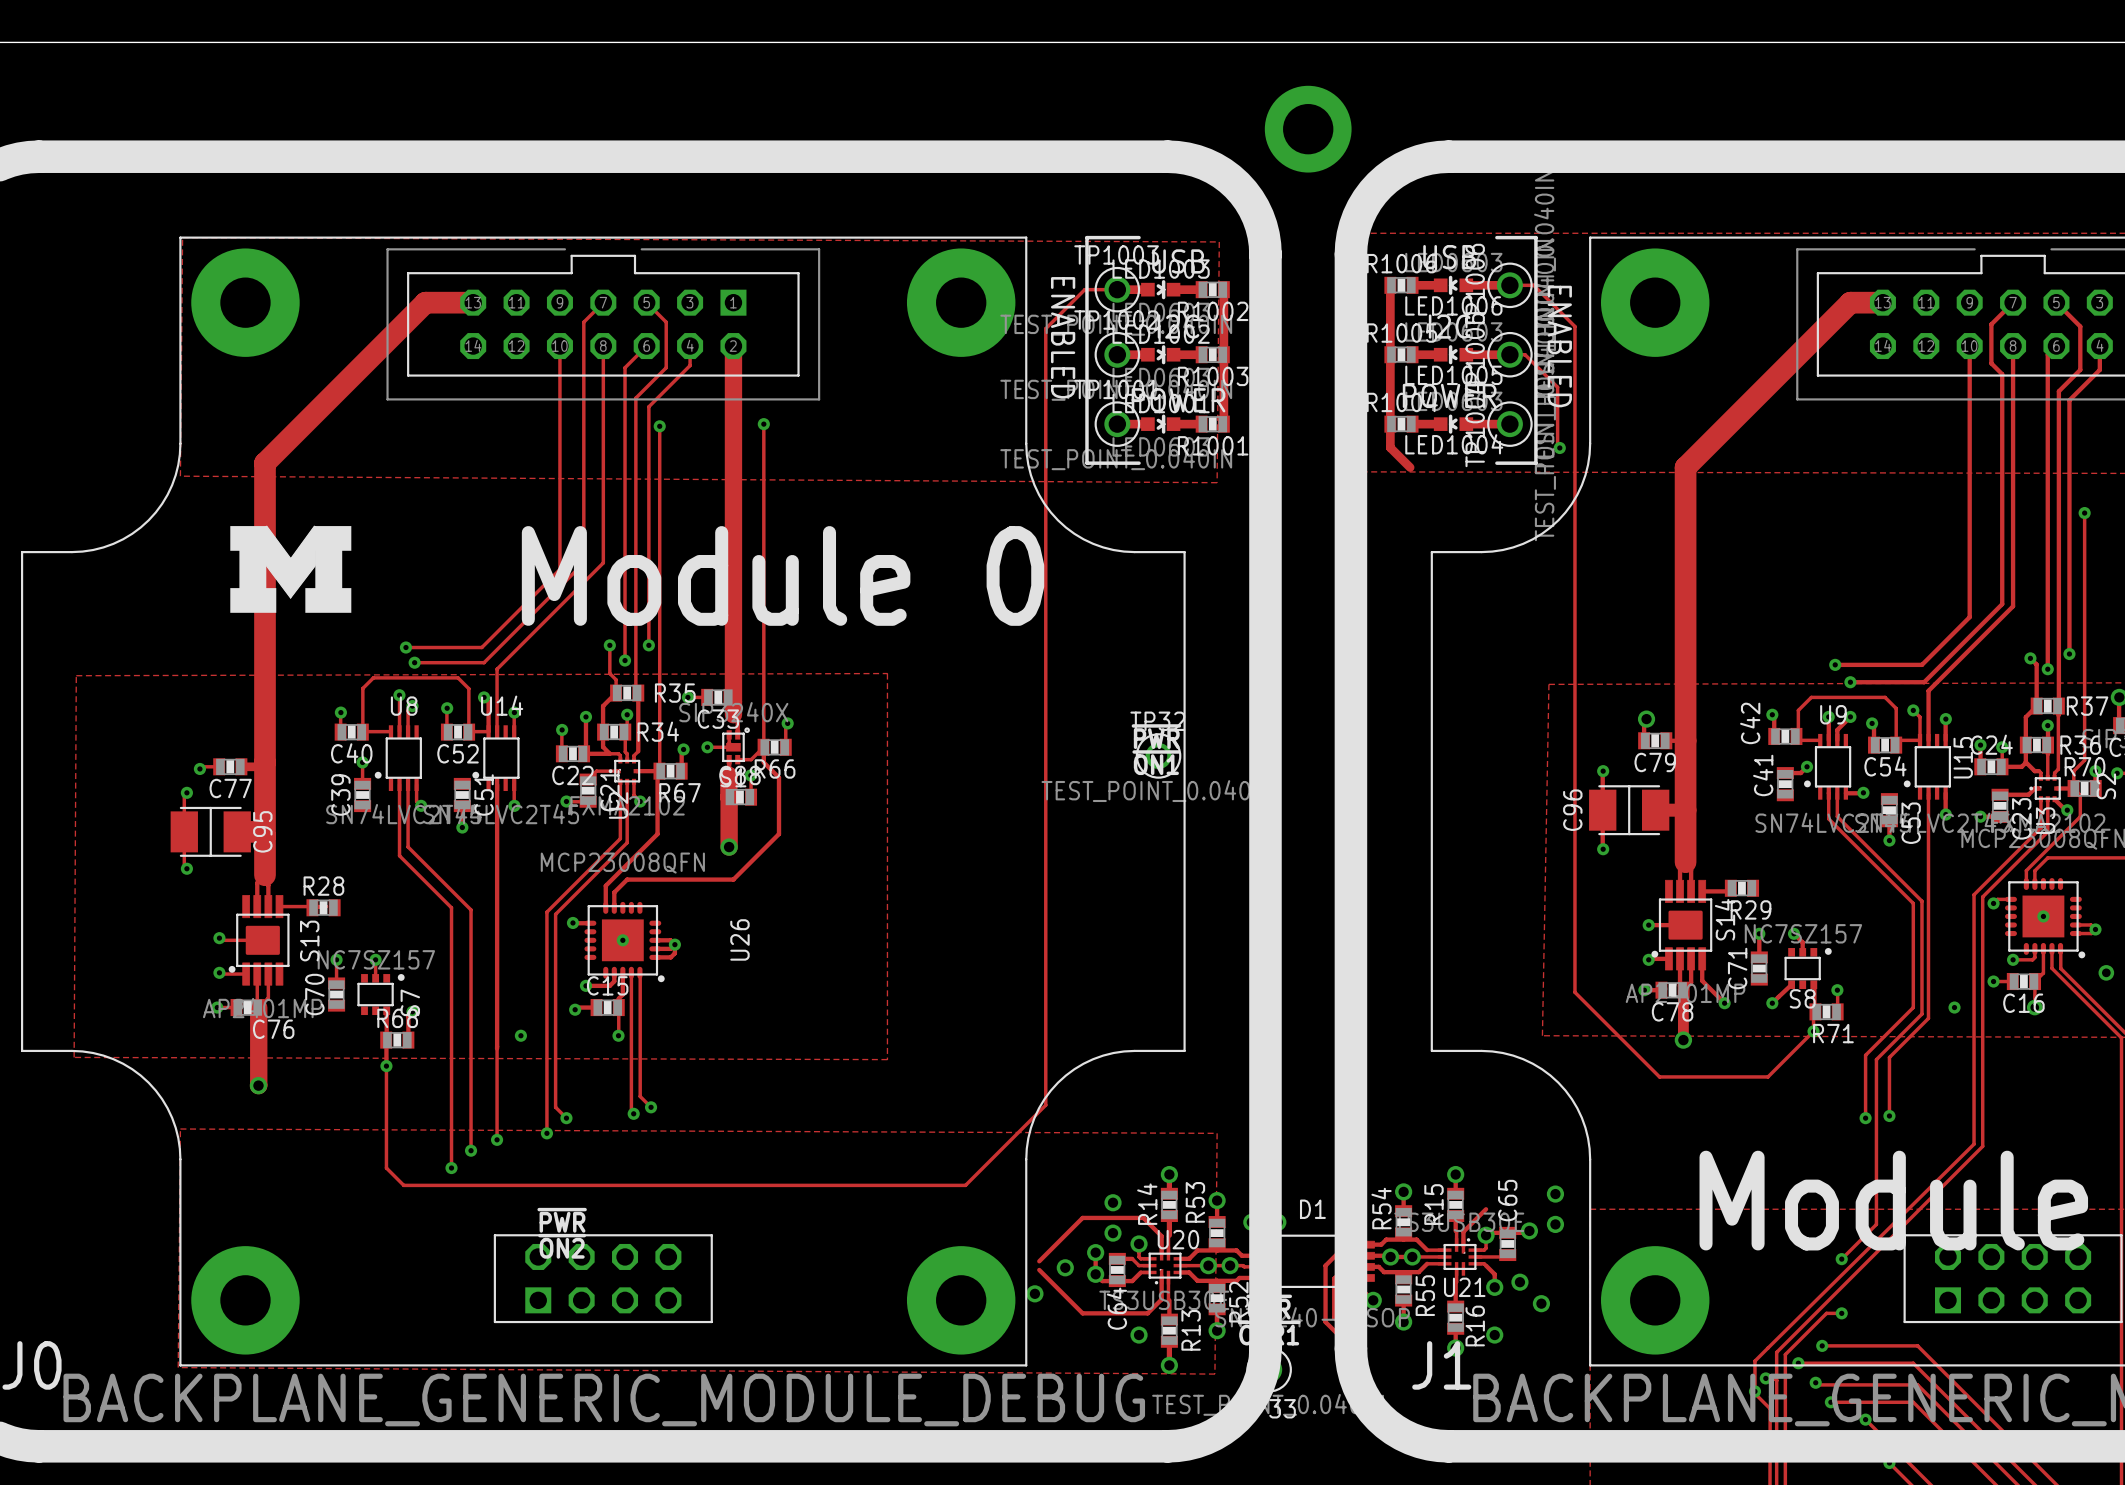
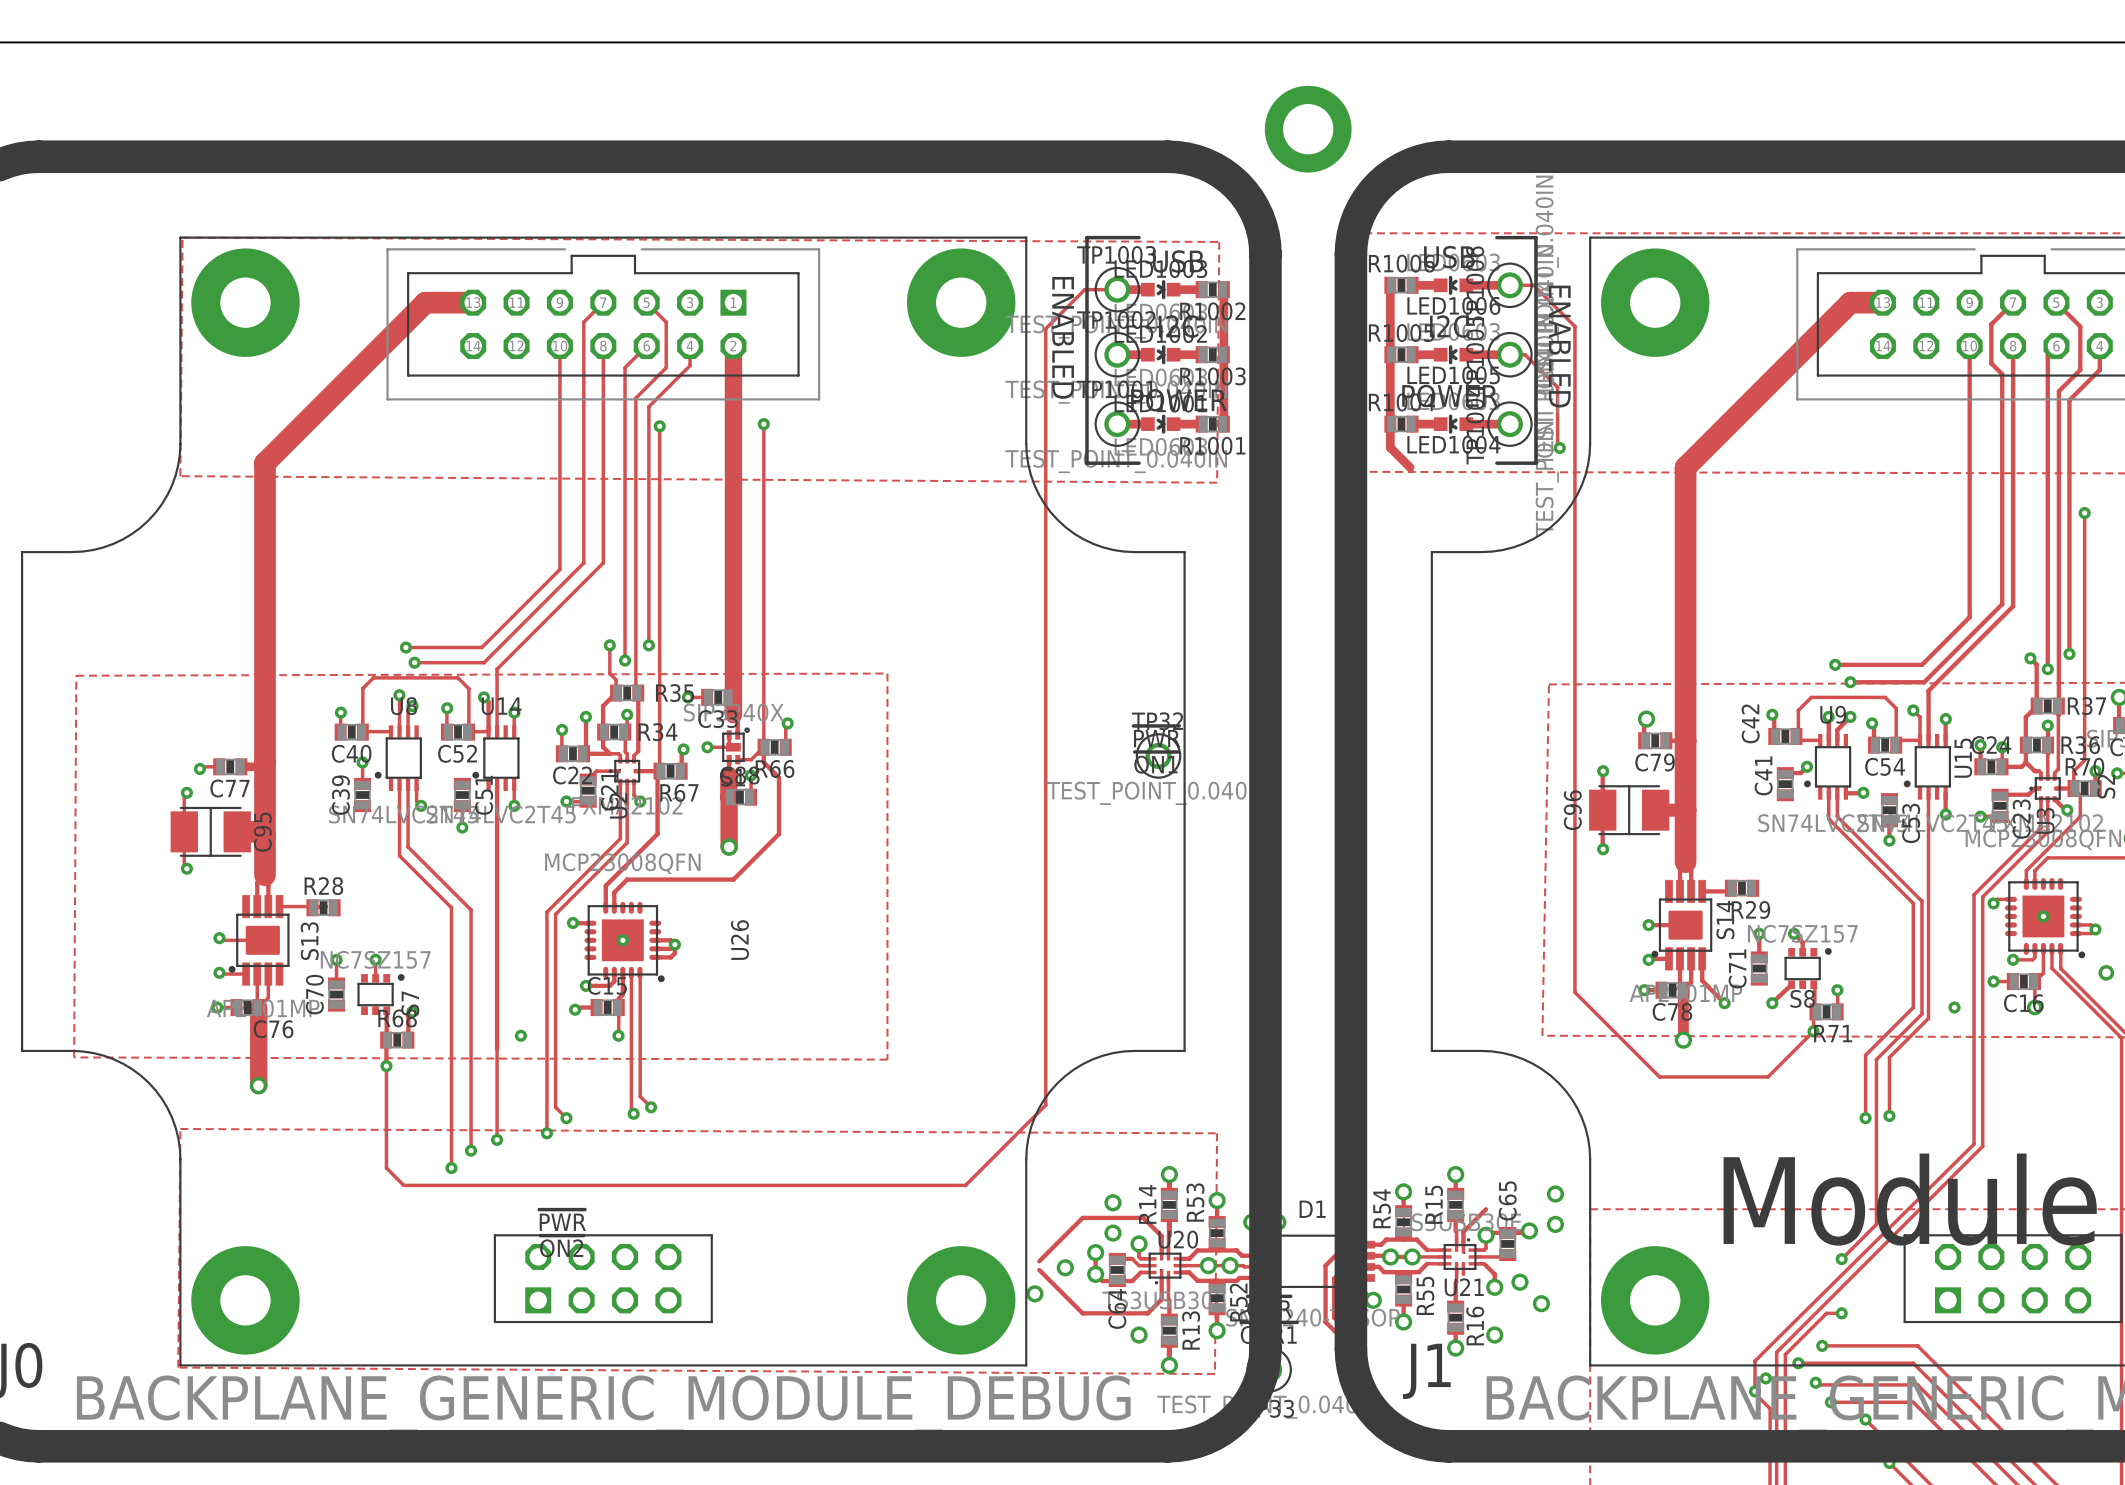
drawing: [230, 526, 352, 613] -> none
text: Module 0 (783, 575) -> none

